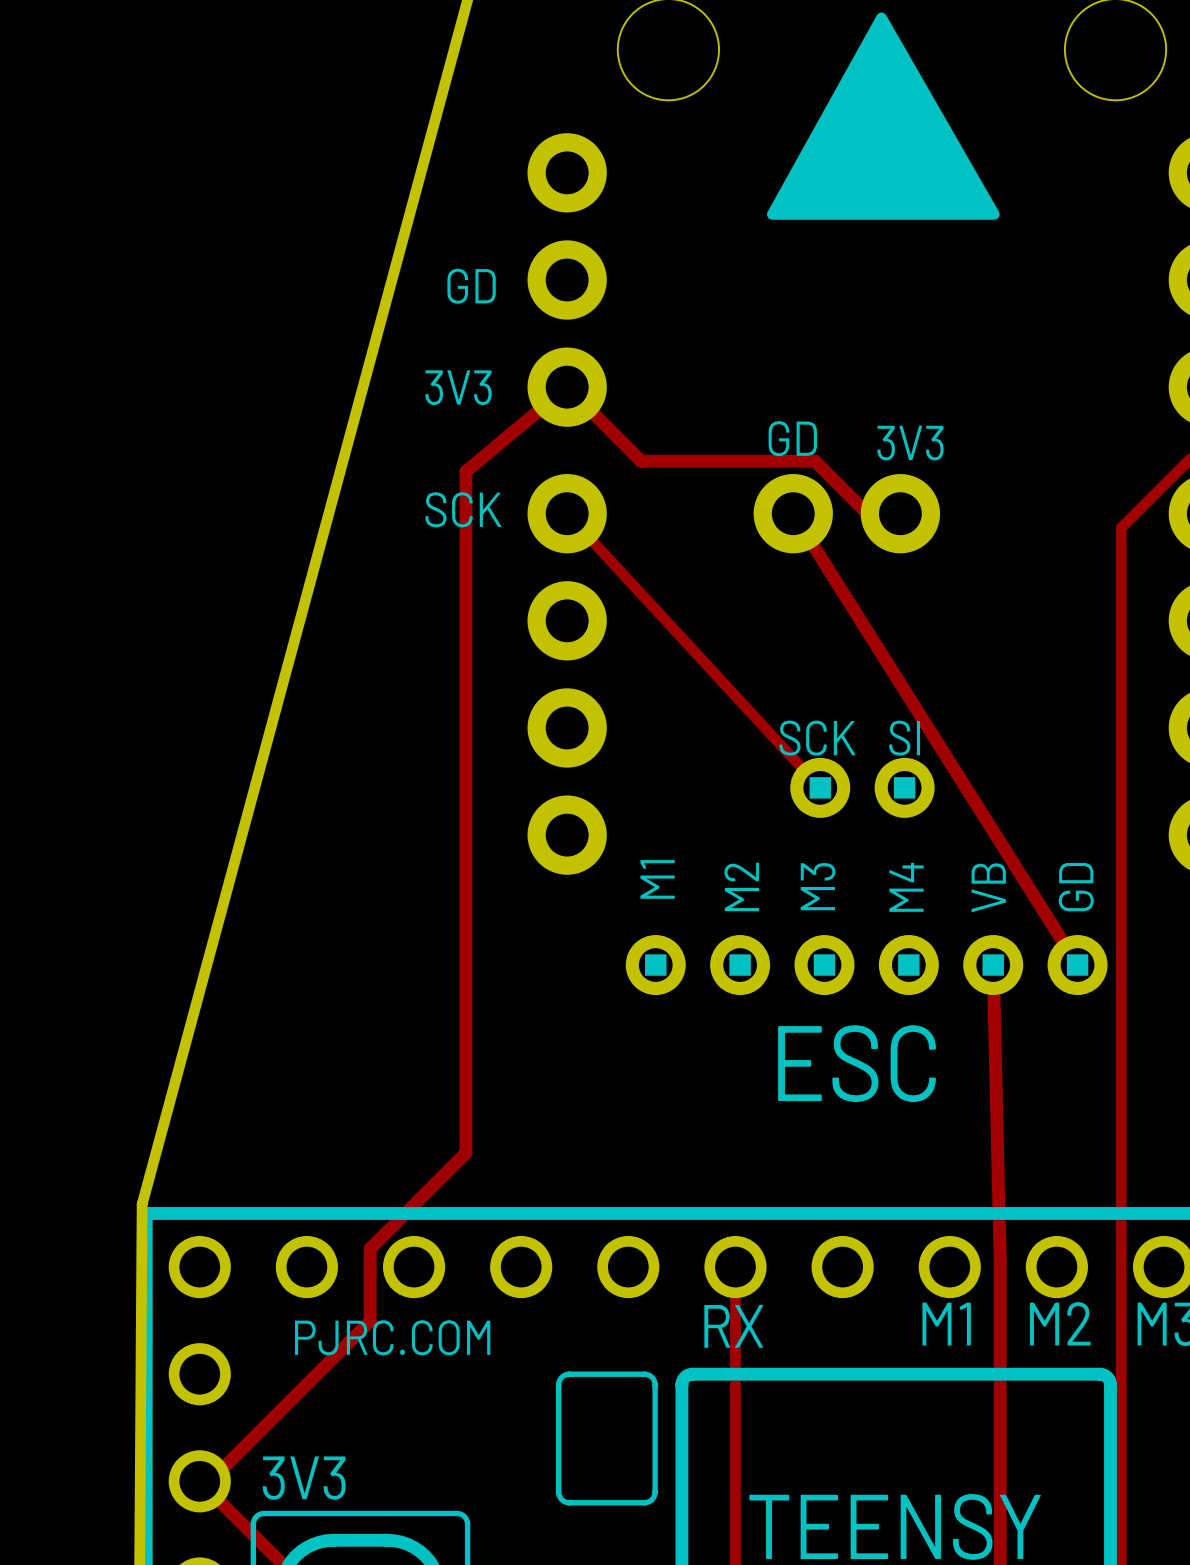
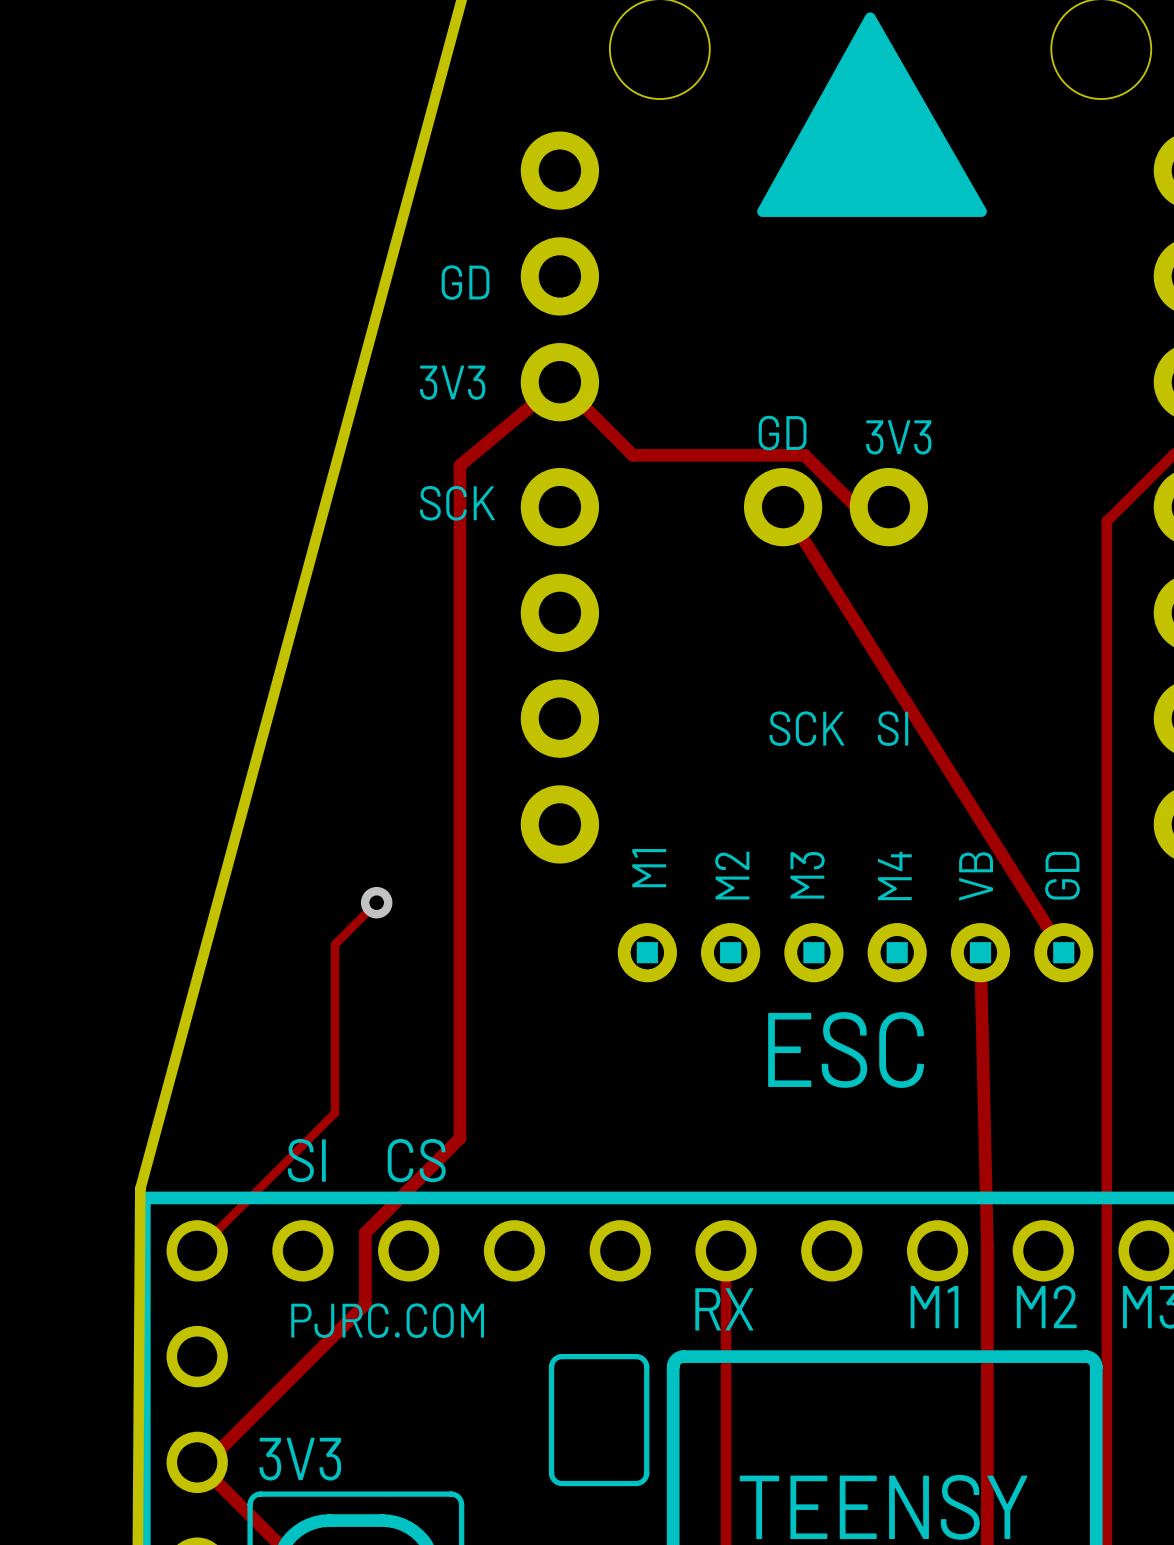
track: (567, 513) (820, 787) -> none
part: (862, 787) -> none
track: none -> (376, 902) (335, 944) (335, 1113) (197, 1250)
via: none -> (376, 902)
text: none -> SI (306, 1160)
text: none -> CS (416, 1160)

